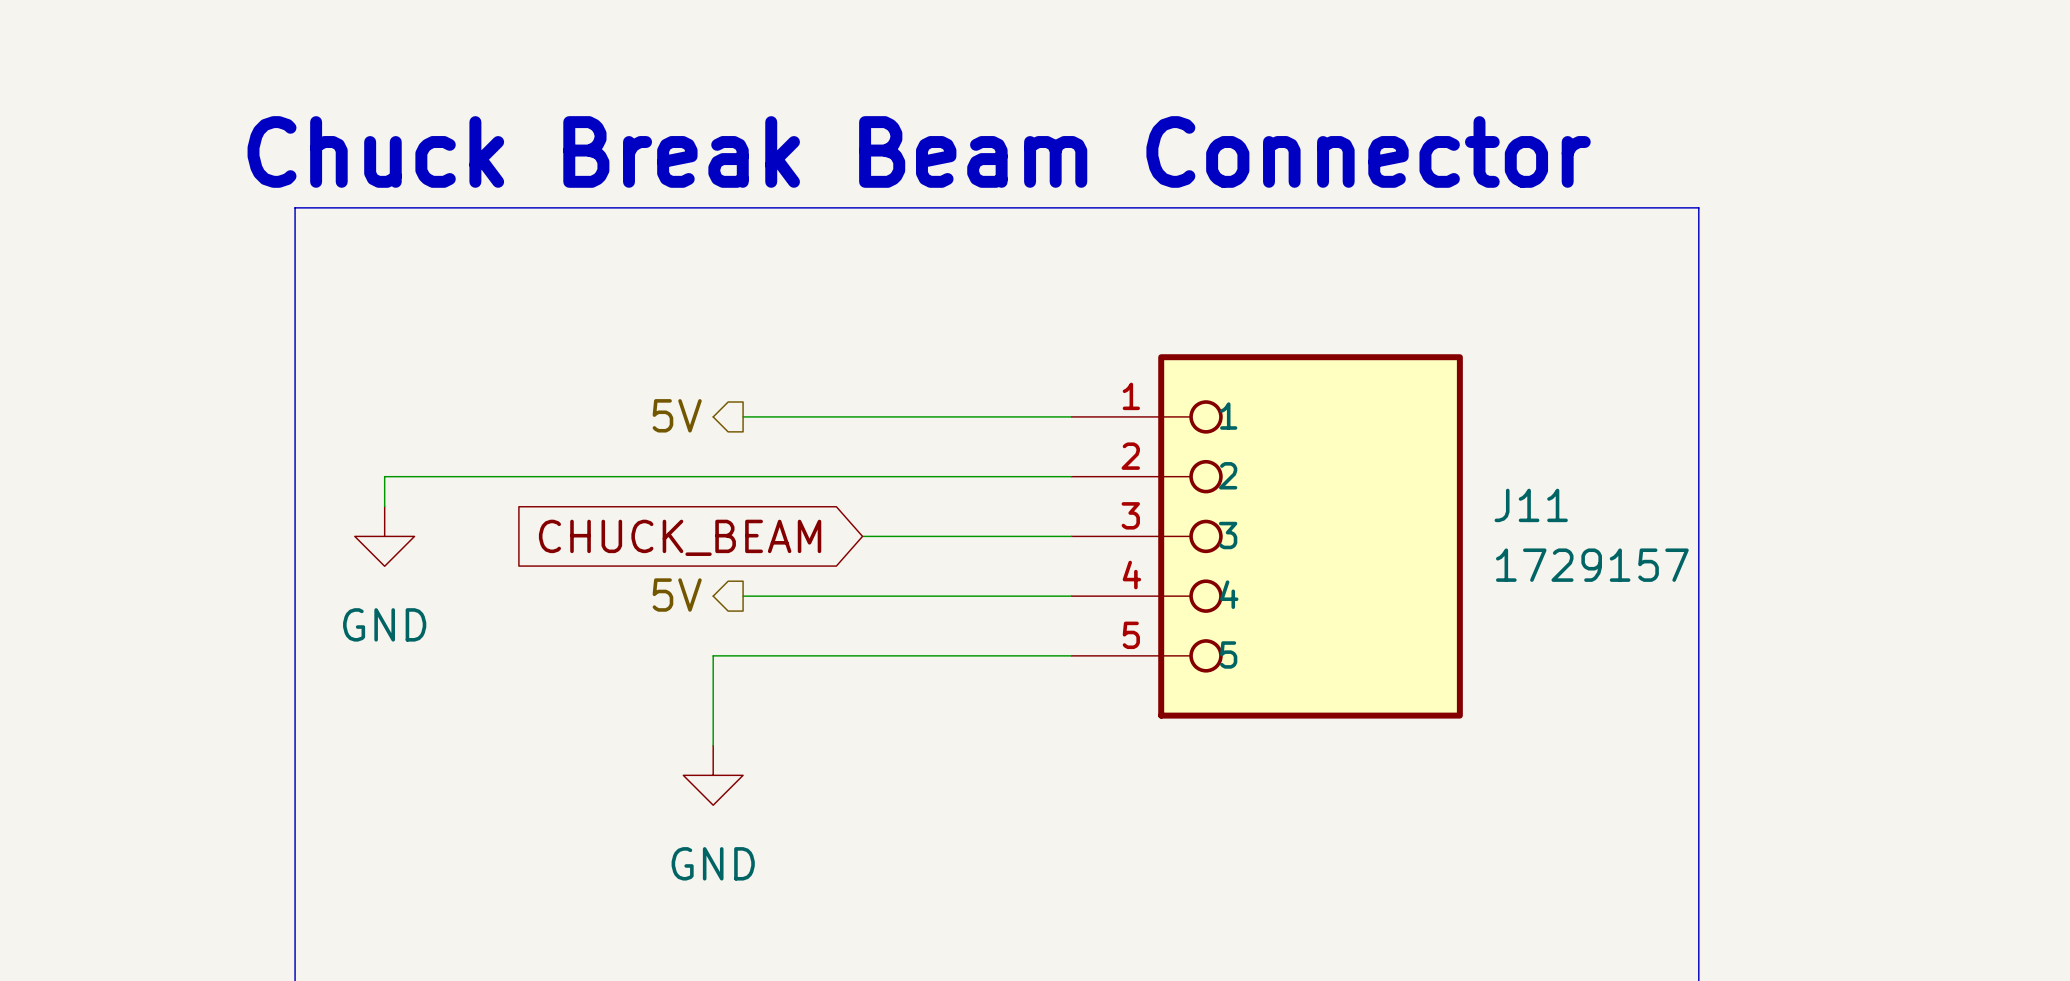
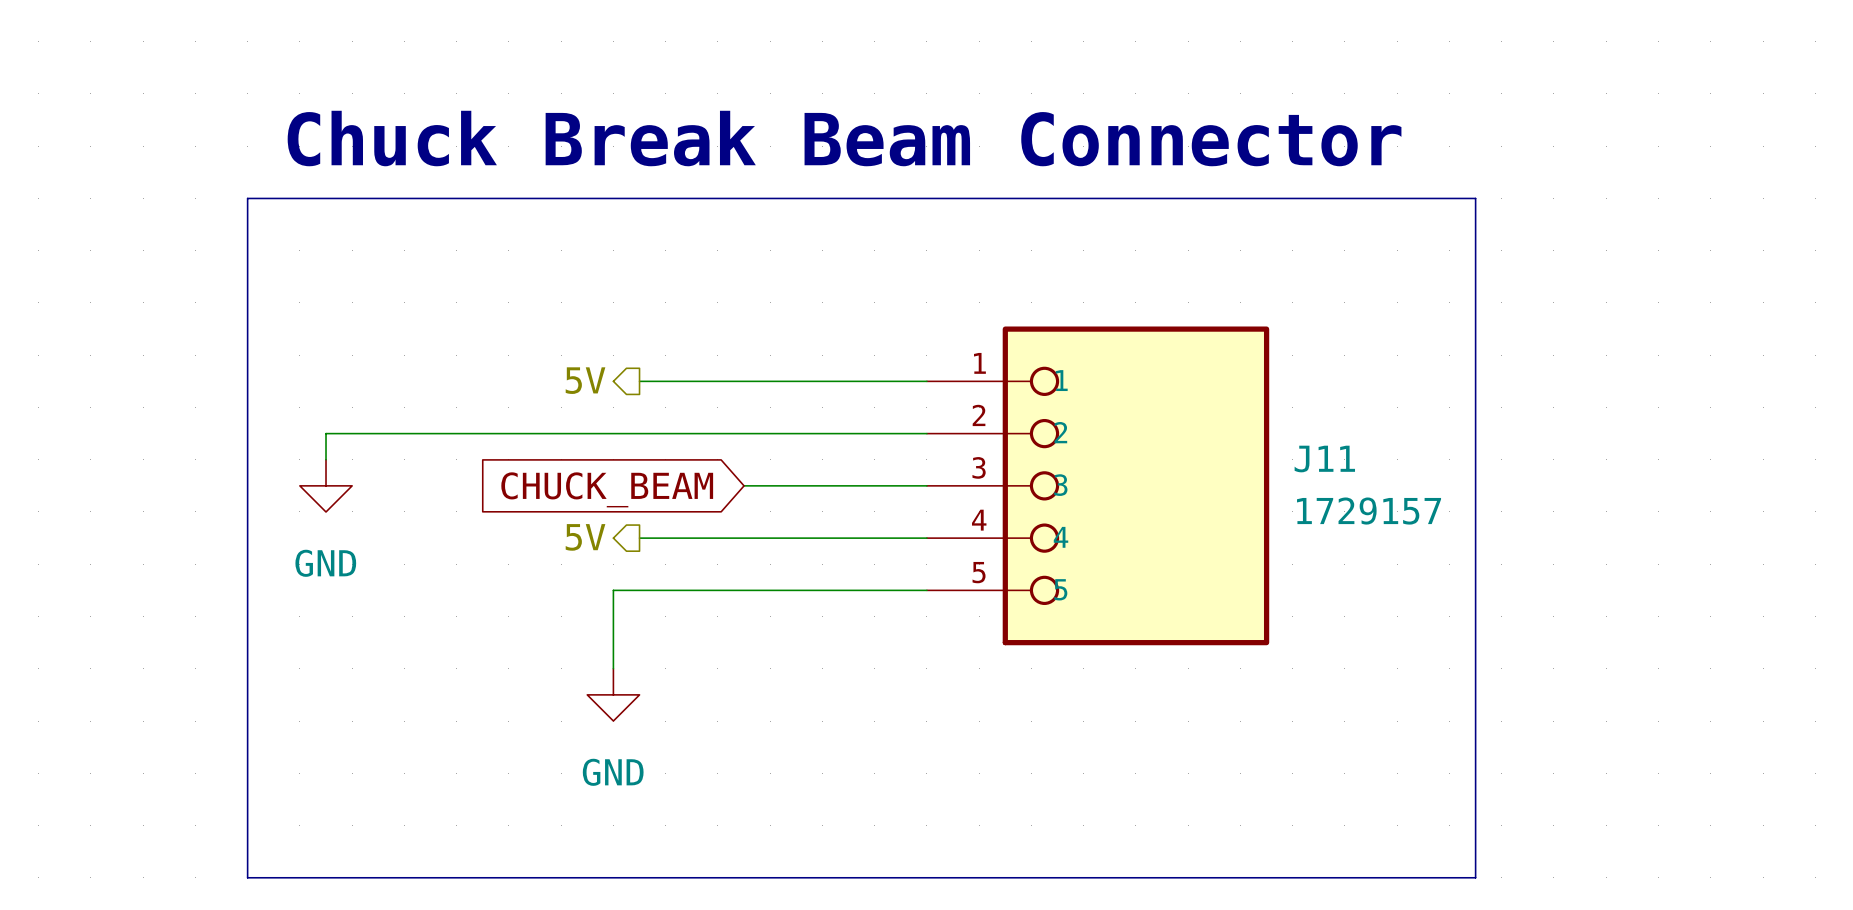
text position: Chuck Break Beam Connector (919, 151) -> Chuck Break Beam Connector (844, 138)

